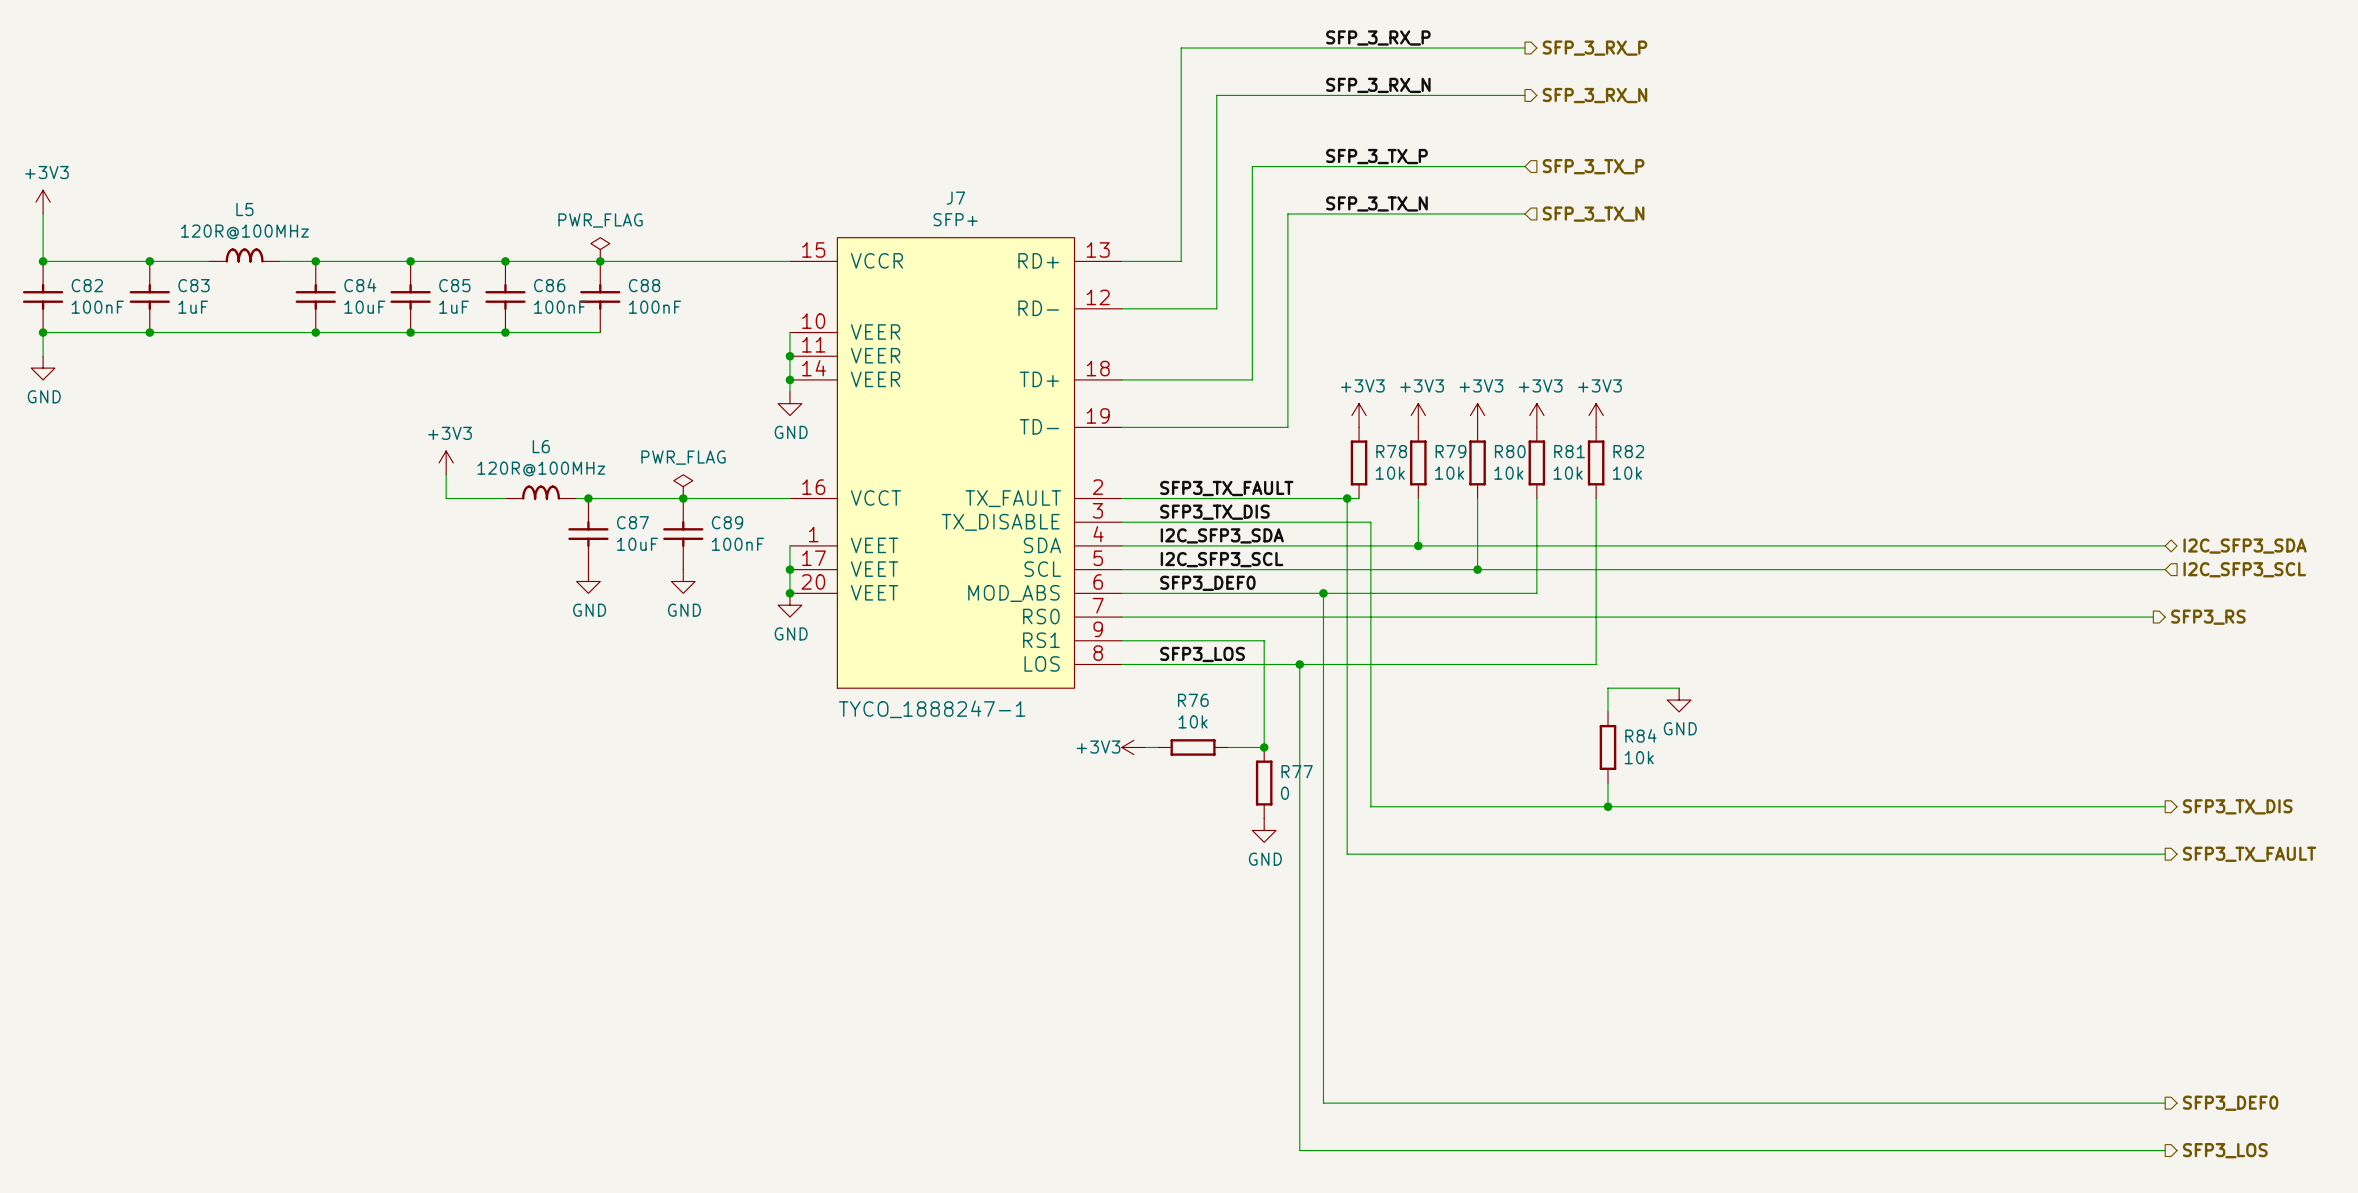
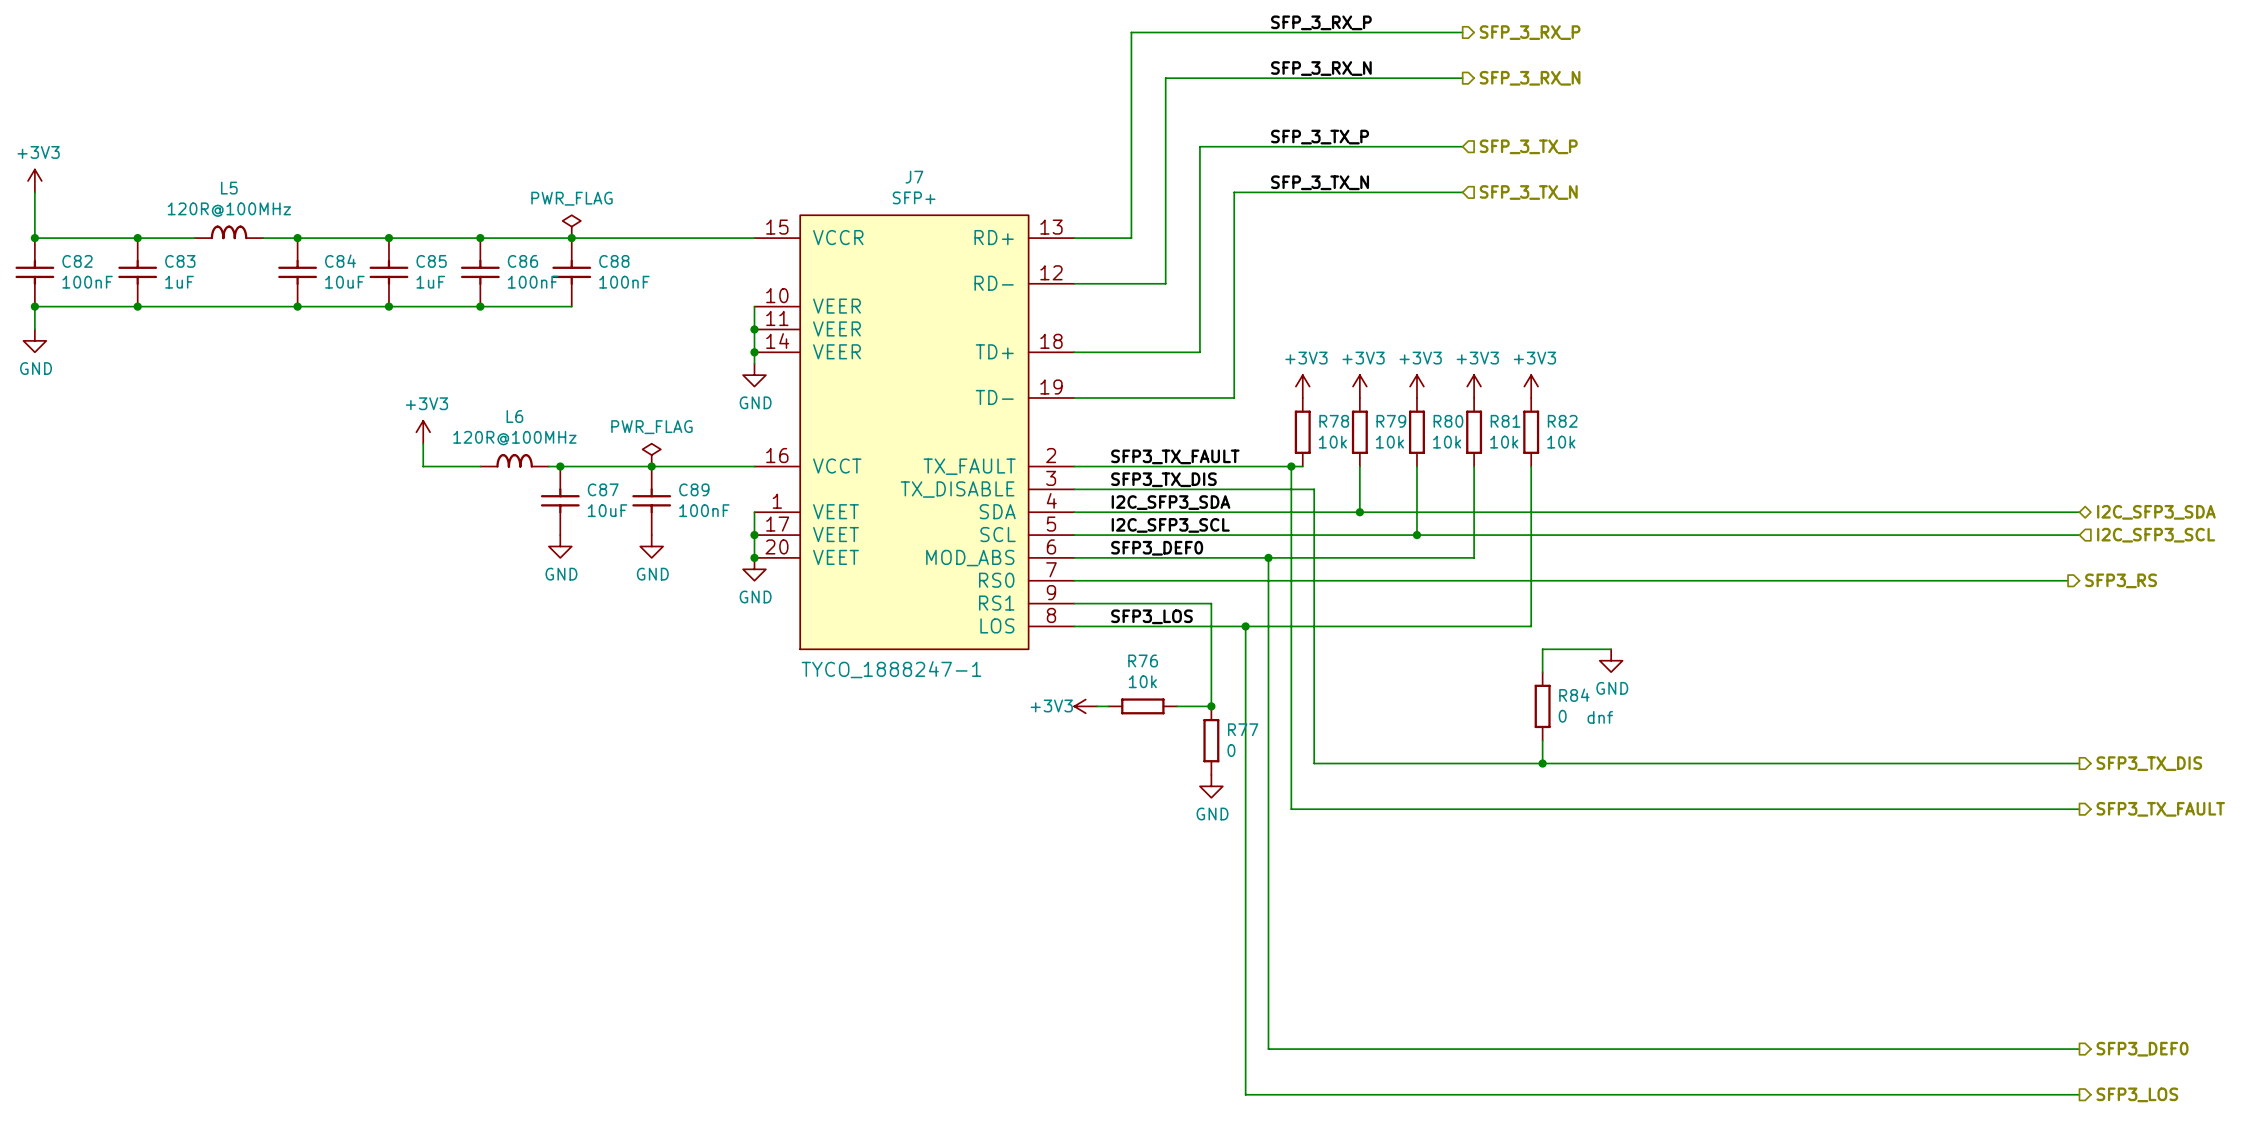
R84 text: 10k (1639, 757) -> 0 (1562, 716)
R84 text: none -> dnf (1600, 717)

